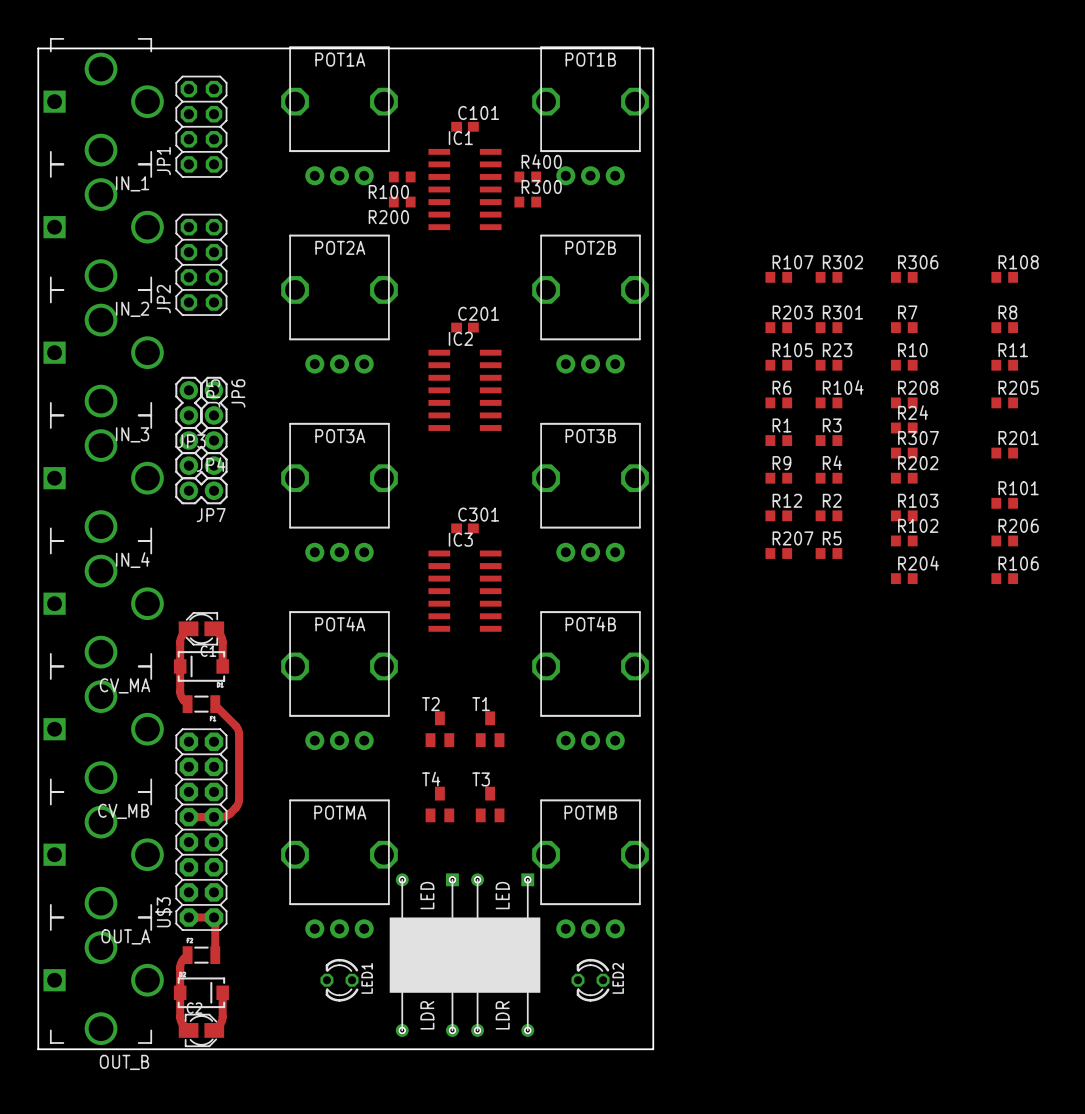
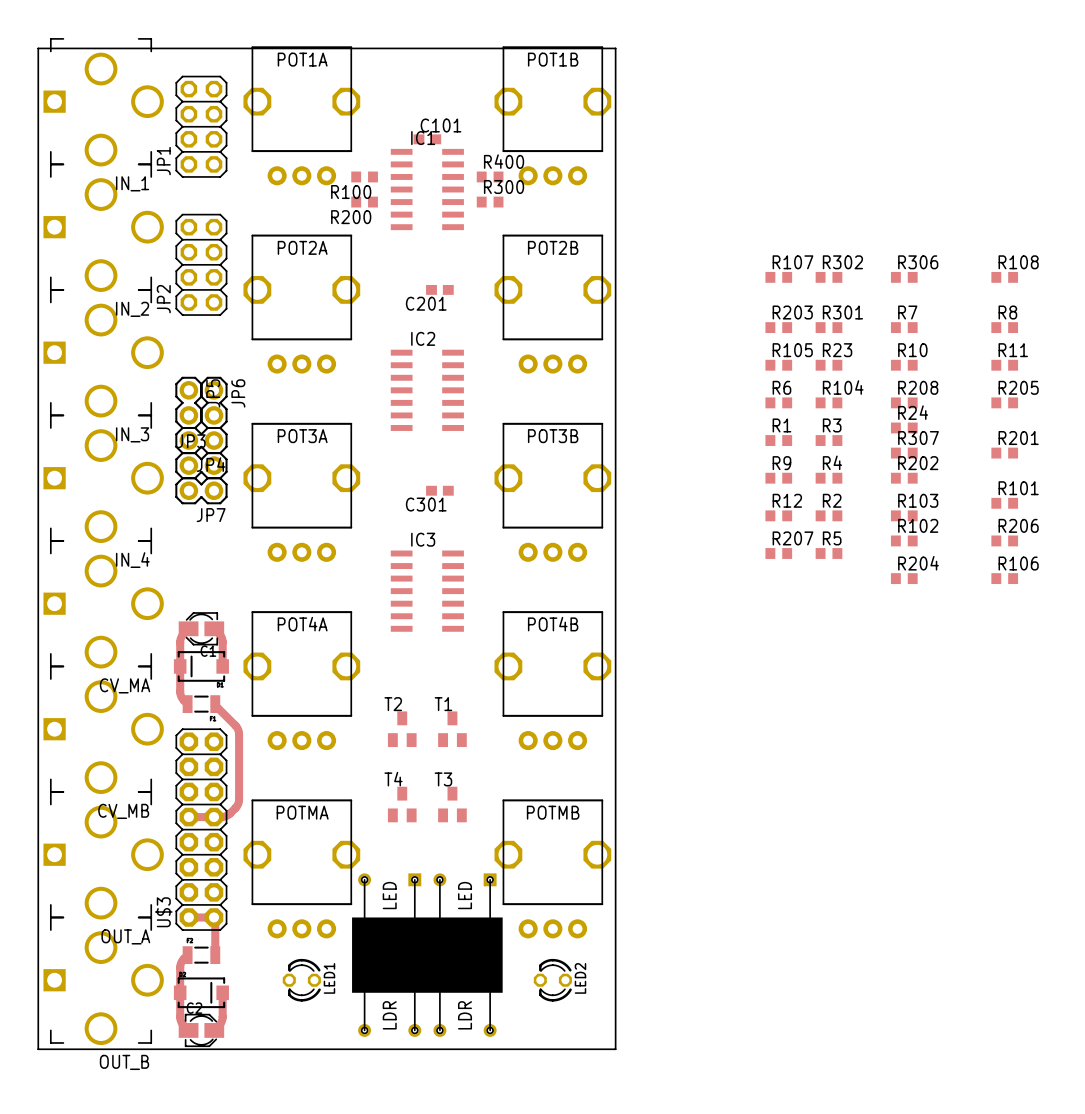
board edge: (615, 48) (653, 48) (653, 1049) (615, 1049) -> (615, 48) (615, 1049)
POT1A position: (339, 115) -> (301, 115)
POT1B position: (590, 115) -> (552, 115)
C101 position: (465, 126) -> (427, 139)
R100 position: (402, 176) -> (364, 176)
R400 position: (527, 176) -> (490, 176)
IC1 position: (465, 189) -> (427, 189)
R200 position: (402, 202) -> (364, 202)
R300 position: (527, 202) -> (490, 202)
POT2A position: (339, 304) -> (301, 304)
POT2B position: (590, 304) -> (552, 304)
C201 name position: C201 (478, 313) -> C201 (426, 303)
C201 position: (465, 327) -> (439, 289)
IC2 position: (465, 390) -> (427, 390)
POT3A position: (339, 492) -> (301, 492)
POT3B position: (590, 492) -> (552, 492)
C301 name position: C301 (478, 514) -> C301 (426, 504)
C301 position: (465, 528) -> (439, 490)
IC3 position: (465, 591) -> (427, 591)
POT4A position: (339, 680) -> (301, 680)
POT4B position: (590, 680) -> (552, 680)
T2 position: (439, 729) -> (402, 729)
T1 position: (490, 729) -> (452, 729)
T4 position: (439, 804) -> (402, 804)
T3 position: (490, 804) -> (452, 804)
POTMA position: (339, 868) -> (301, 868)
POTMB position: (590, 868) -> (552, 868)
part: none -> (389, 955)
part: (427, 955) -> none
part: none -> (465, 955)
part: (502, 955) -> none
LED1 position: (339, 980) -> (301, 980)
LED2 position: (590, 980) -> (552, 980)

